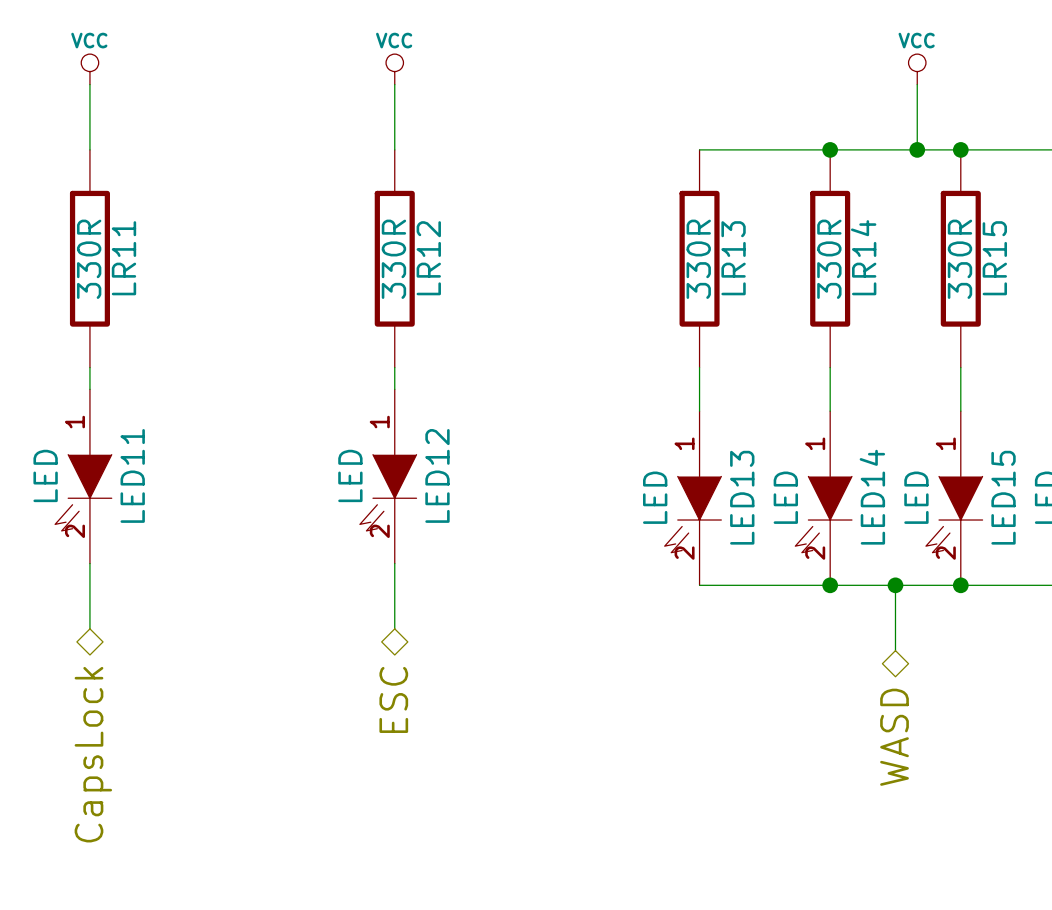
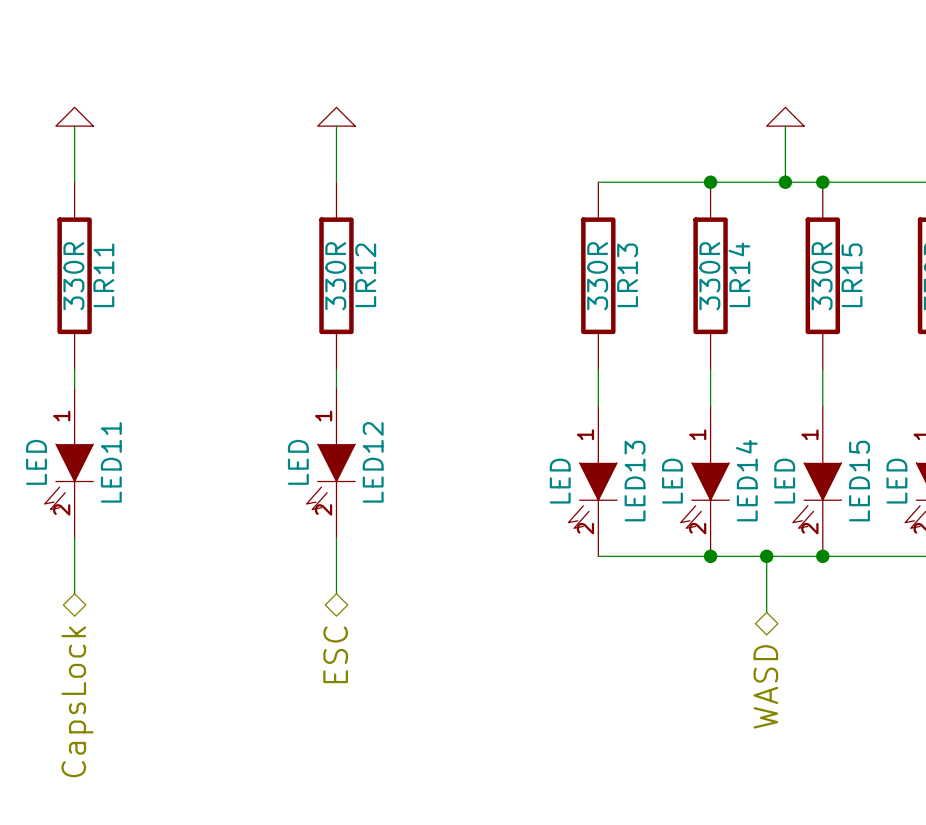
power symbol text: VCC (89, 40) -> none
power symbol text: VCC (394, 40) -> none
power symbol text: VCC (916, 40) -> none
power symbol shape: [81, 54, 99, 85] -> [55, 107, 94, 127]
power symbol shape: [386, 54, 404, 85] -> [317, 107, 356, 127]
power symbol shape: [908, 54, 926, 85] -> [766, 107, 805, 127]

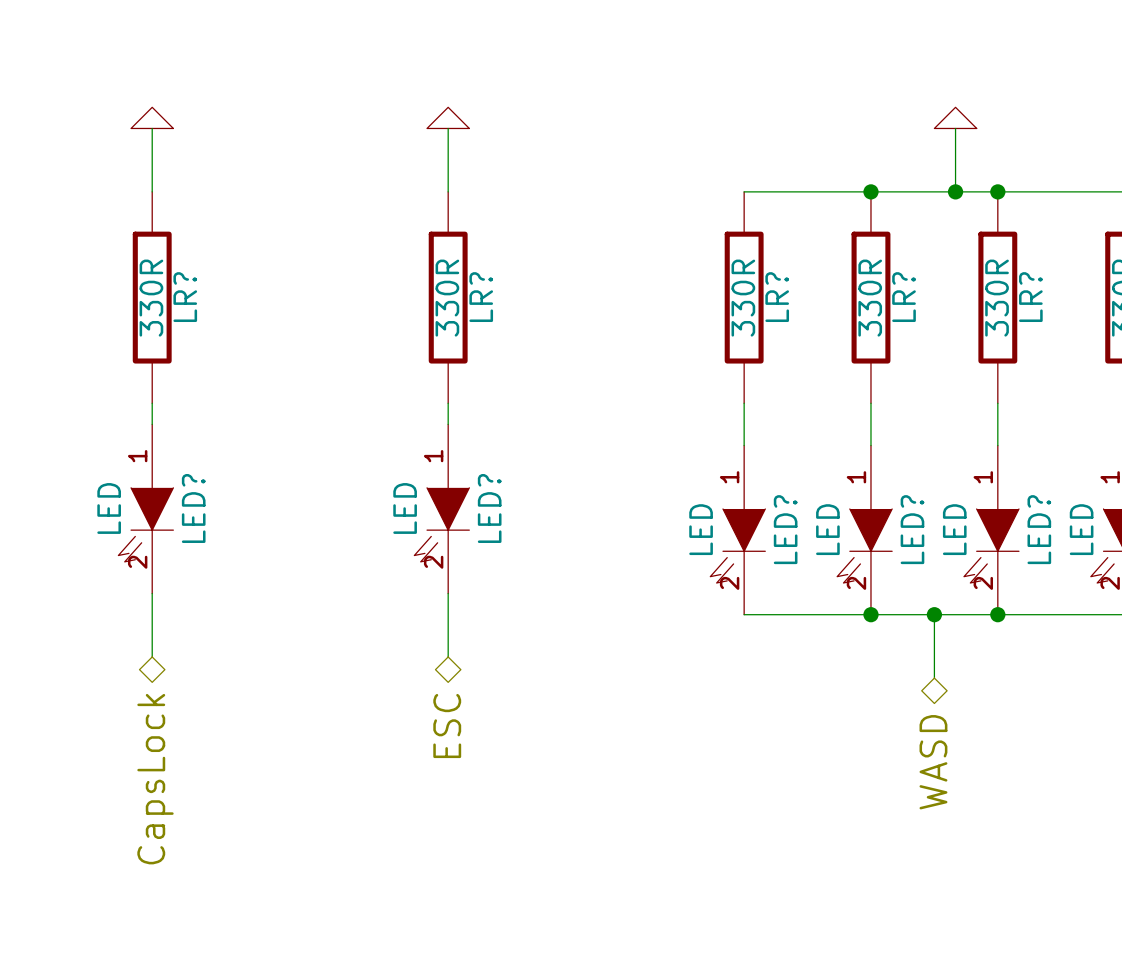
LR14 name: LR14 (739, 274) -> LR? (904, 297)
LR11 name: LR11 (103, 275) -> LR? (185, 297)
LR12 name: LR12 (365, 275) -> LR? (481, 297)
LR13 name: LR13 (627, 275) -> LR? (777, 297)
LR15 name: LR15 (852, 275) -> LR? (1030, 297)
LED11 name: LED11 (111, 462) -> LED? (193, 508)
LED12 name: LED12 (373, 462) -> LED? (489, 508)
LED14 name: LED14 (746, 480) -> LED? (912, 529)
LED13 name: LED13 (635, 481) -> LED? (785, 529)
LED15 name: LED15 (859, 481) -> LED? (1039, 529)

